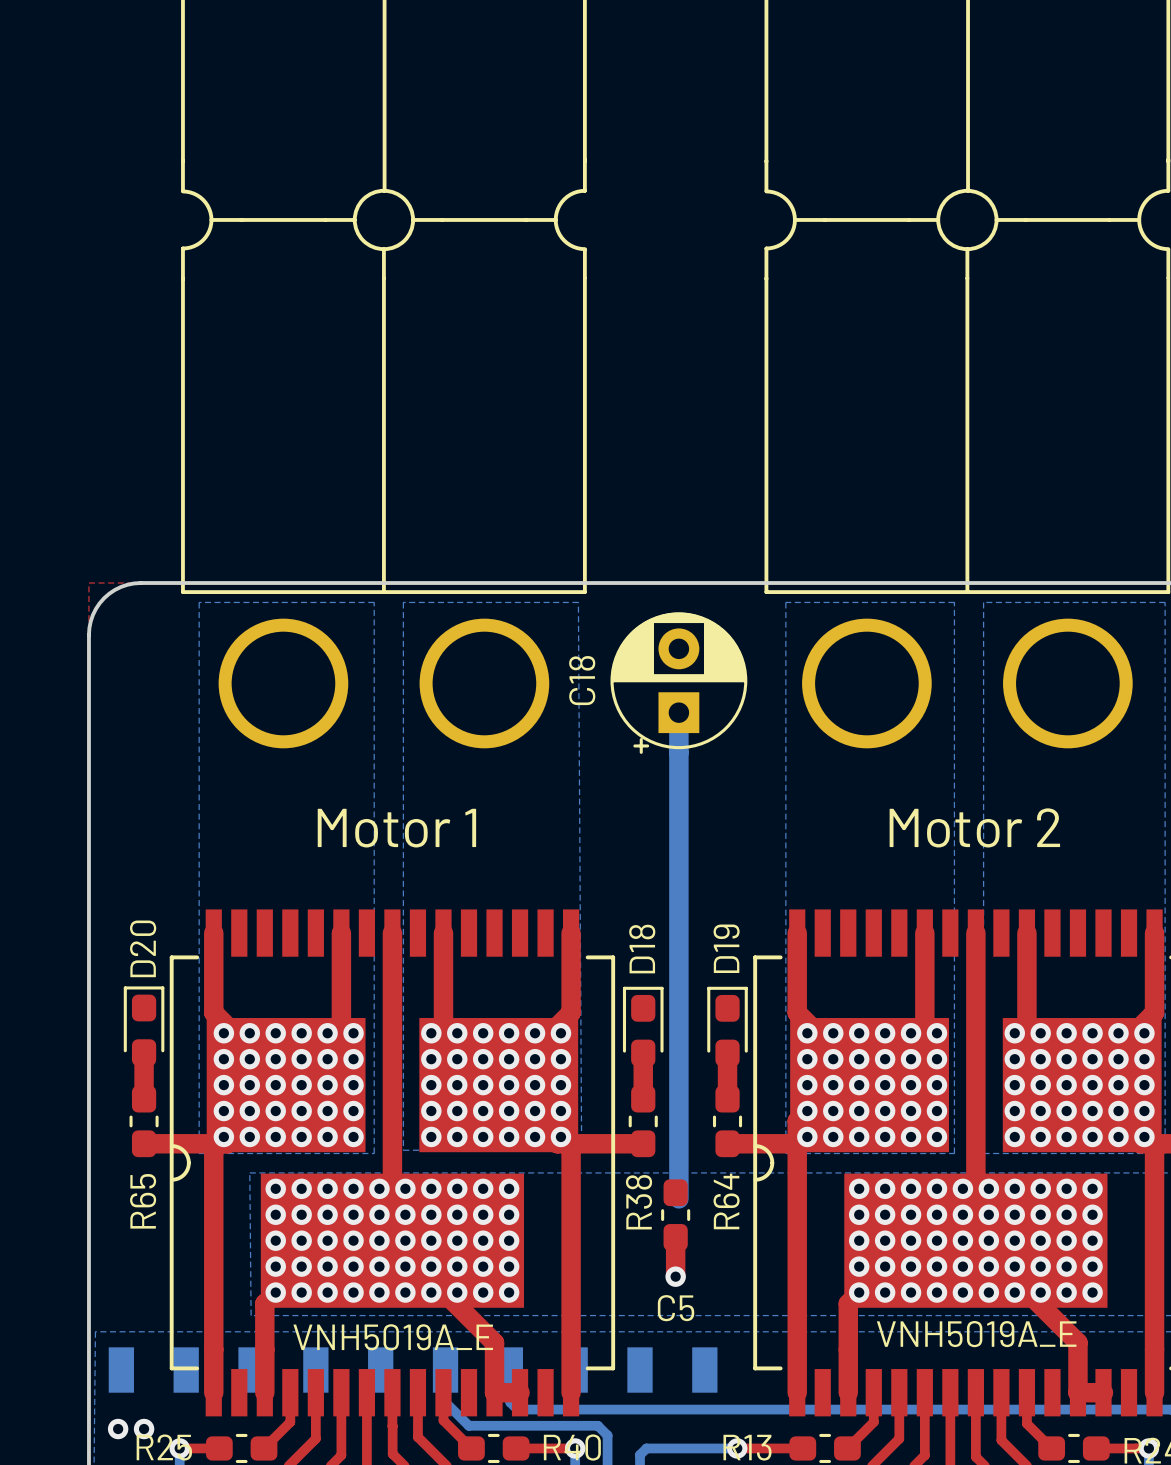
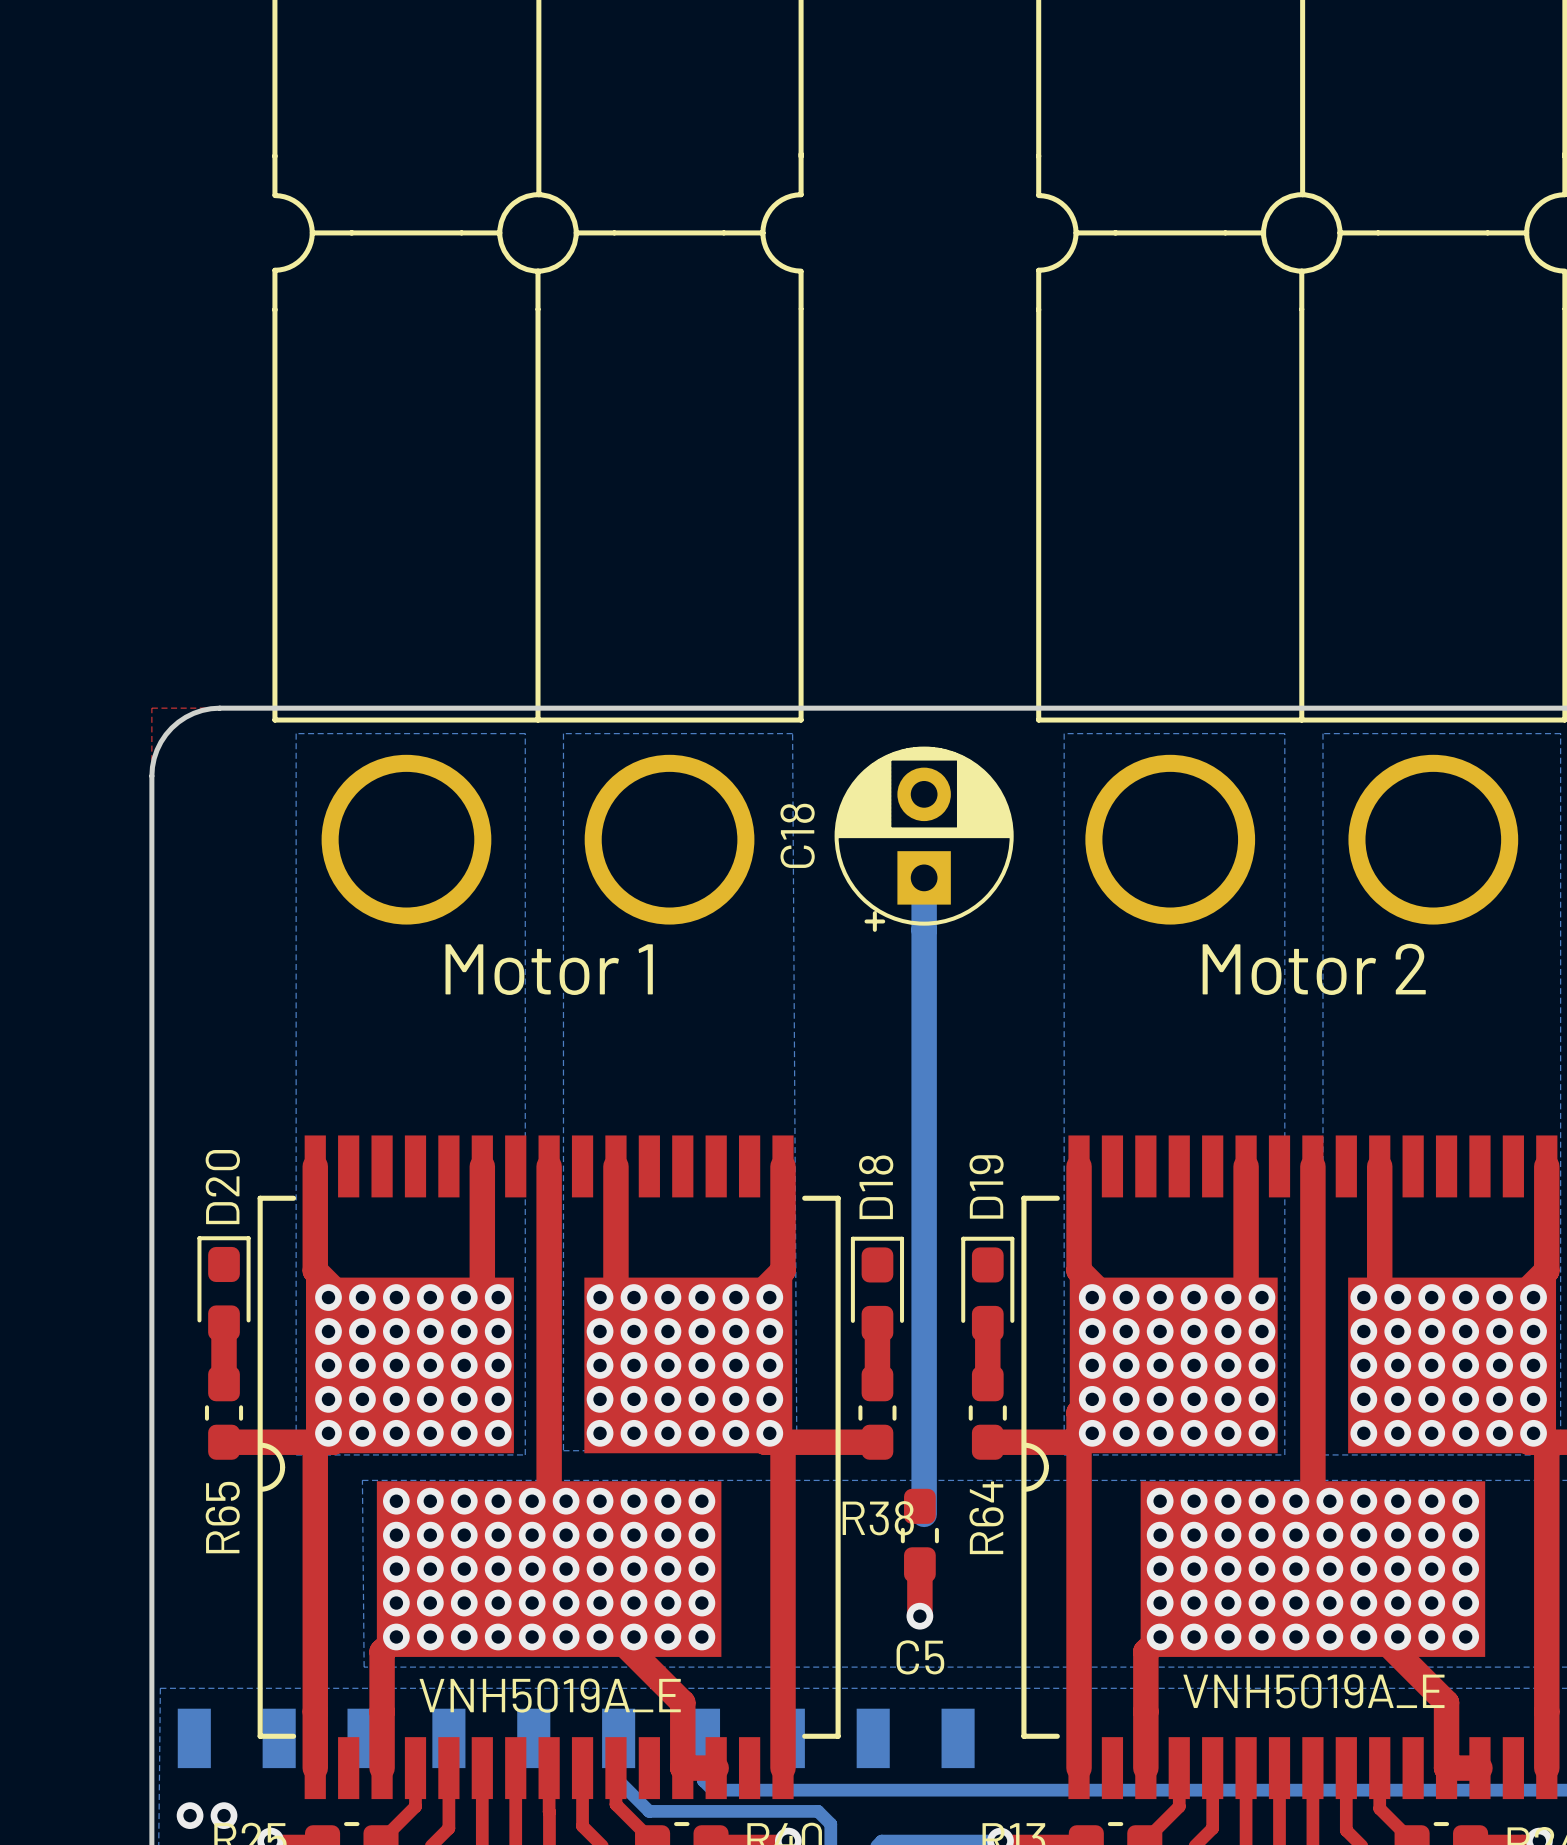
text position: Motor 2 (974, 827) -> Motor 2 (1314, 969)
text position: Motor 1 (396, 828) -> Motor 1 (549, 969)
R38 name rotation: 0° (639, 1202) -> 90° clockwise (878, 1518)

